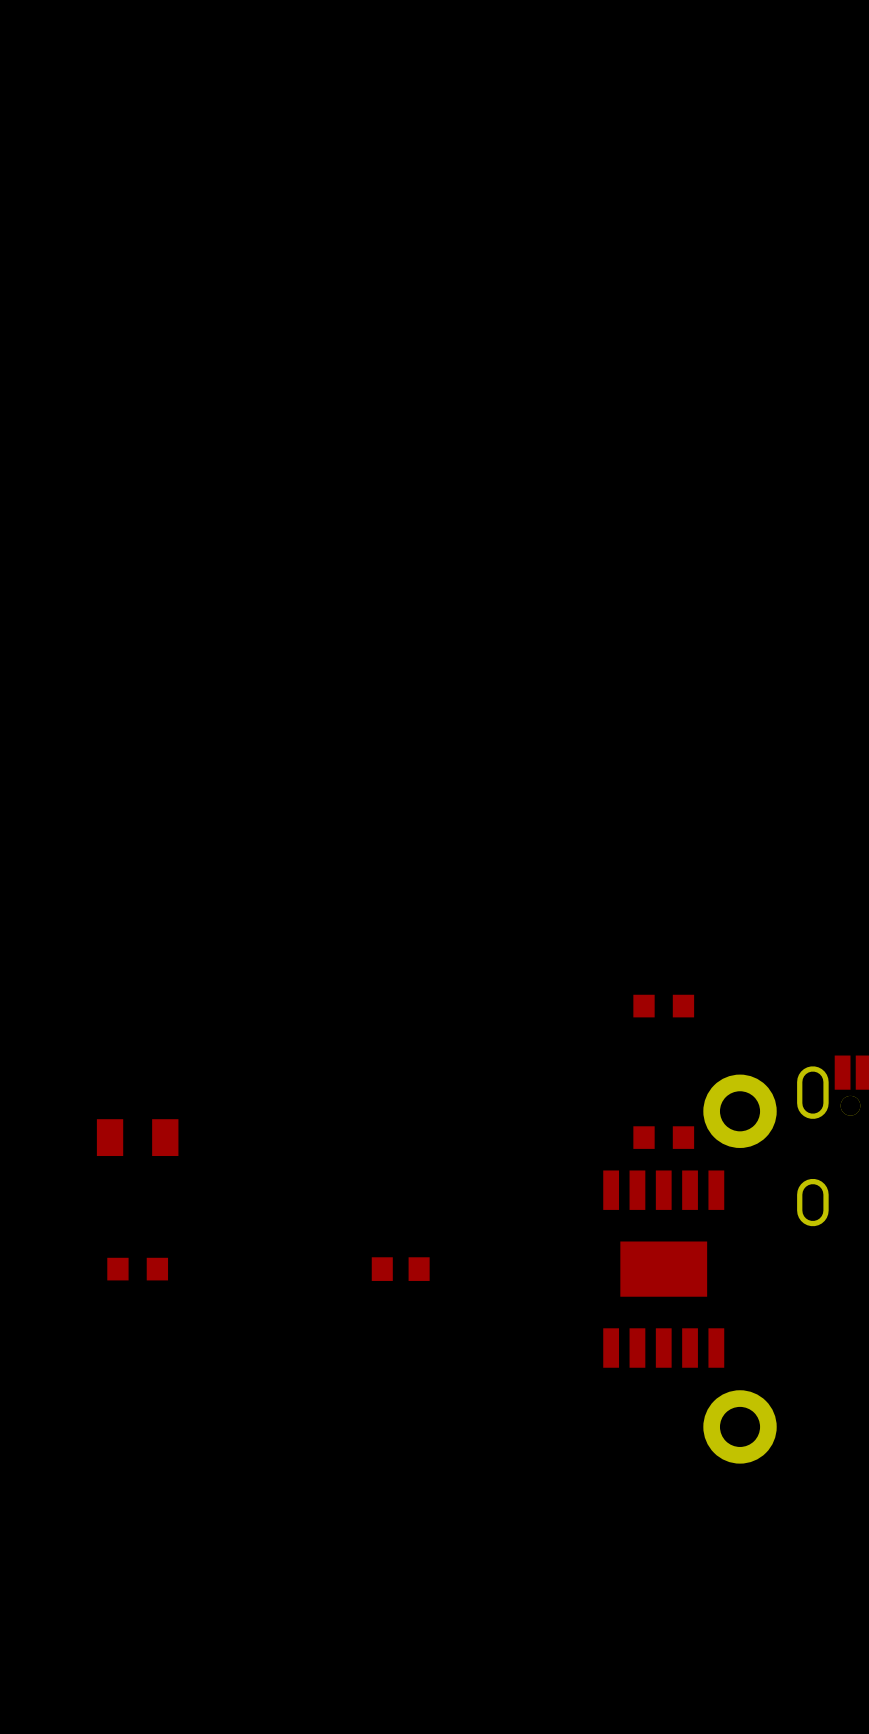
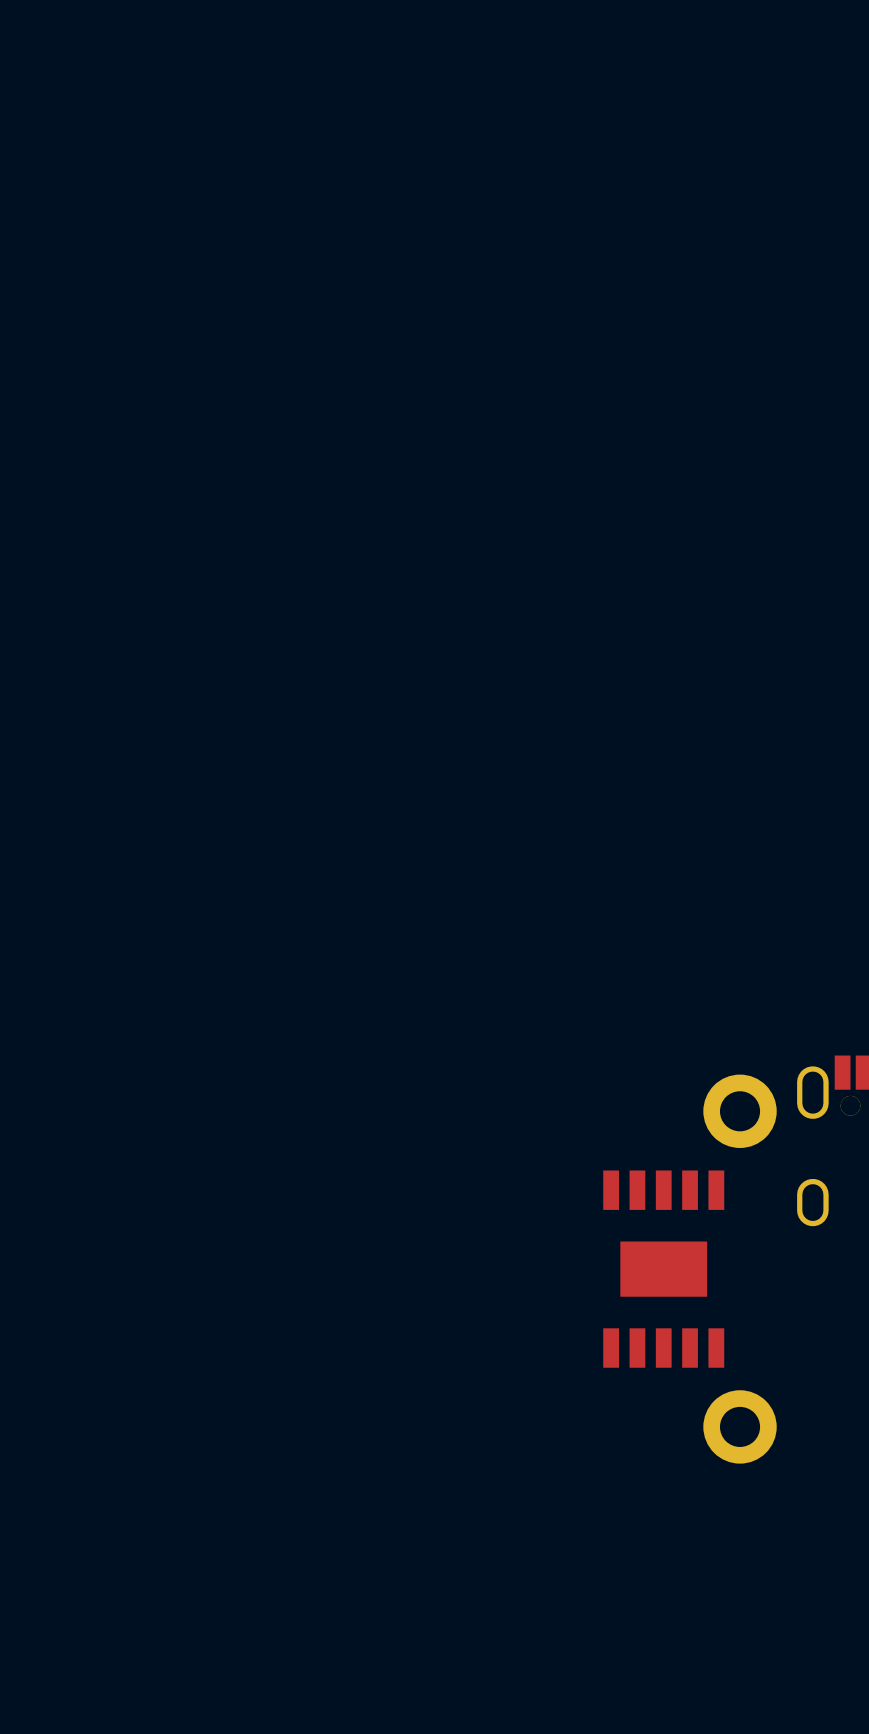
part: (663, 1006) -> none
part: (137, 1137) -> none
part: (663, 1137) -> none
part: (137, 1269) -> none
part: (400, 1269) -> none

